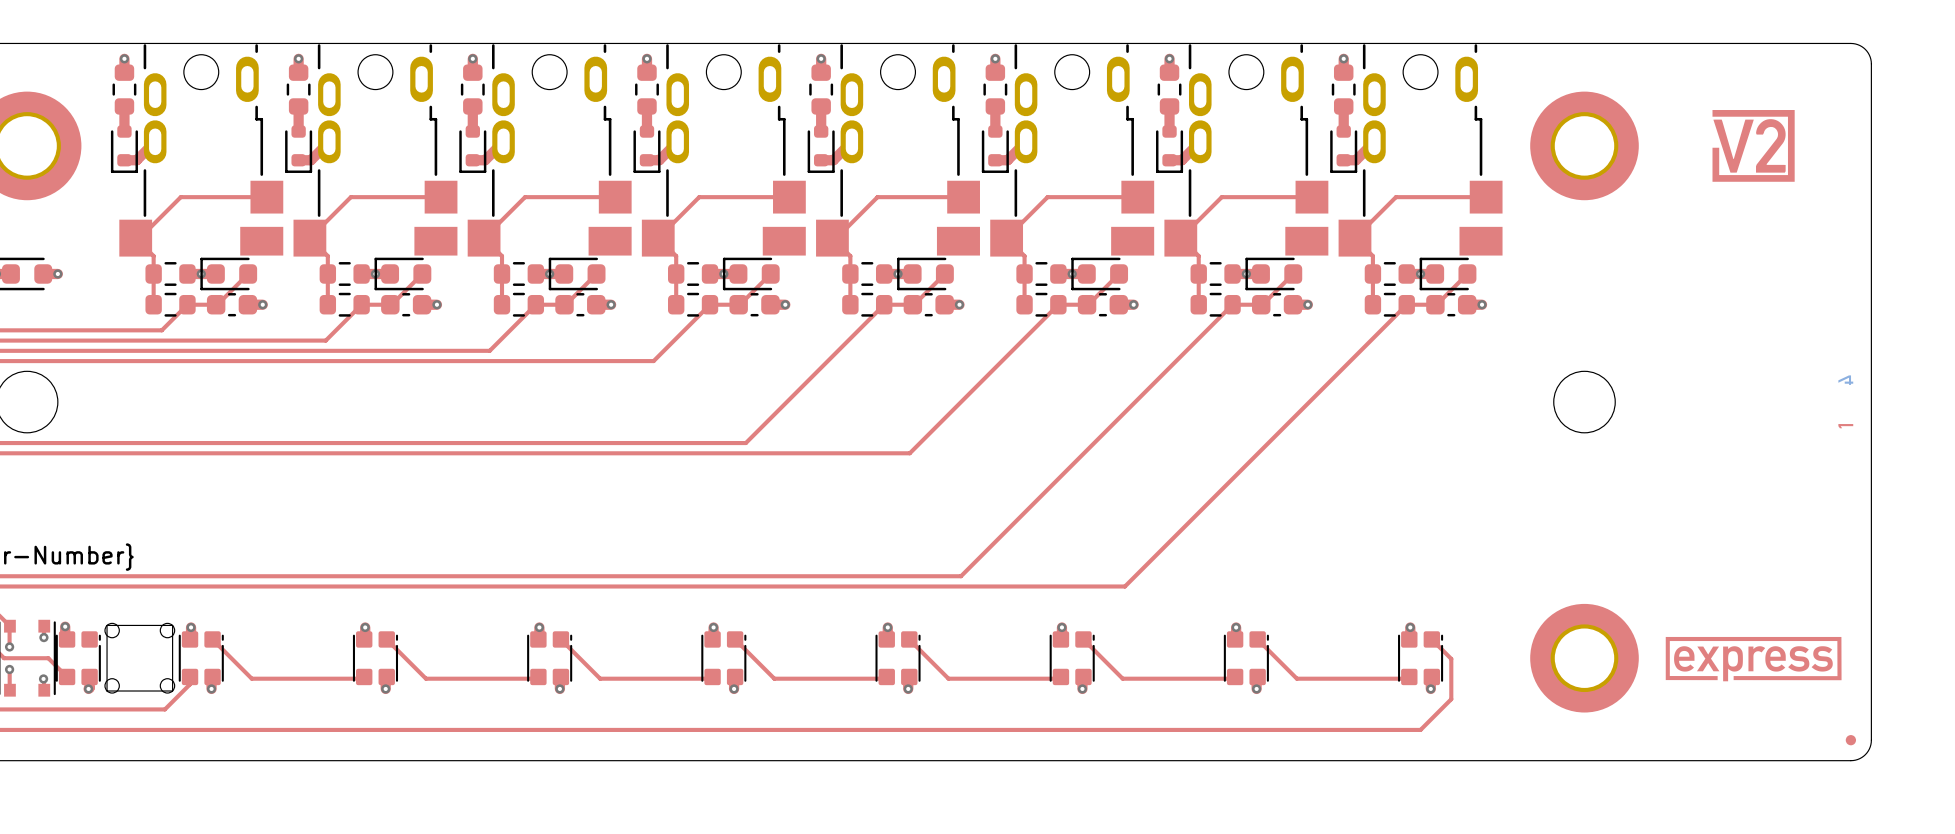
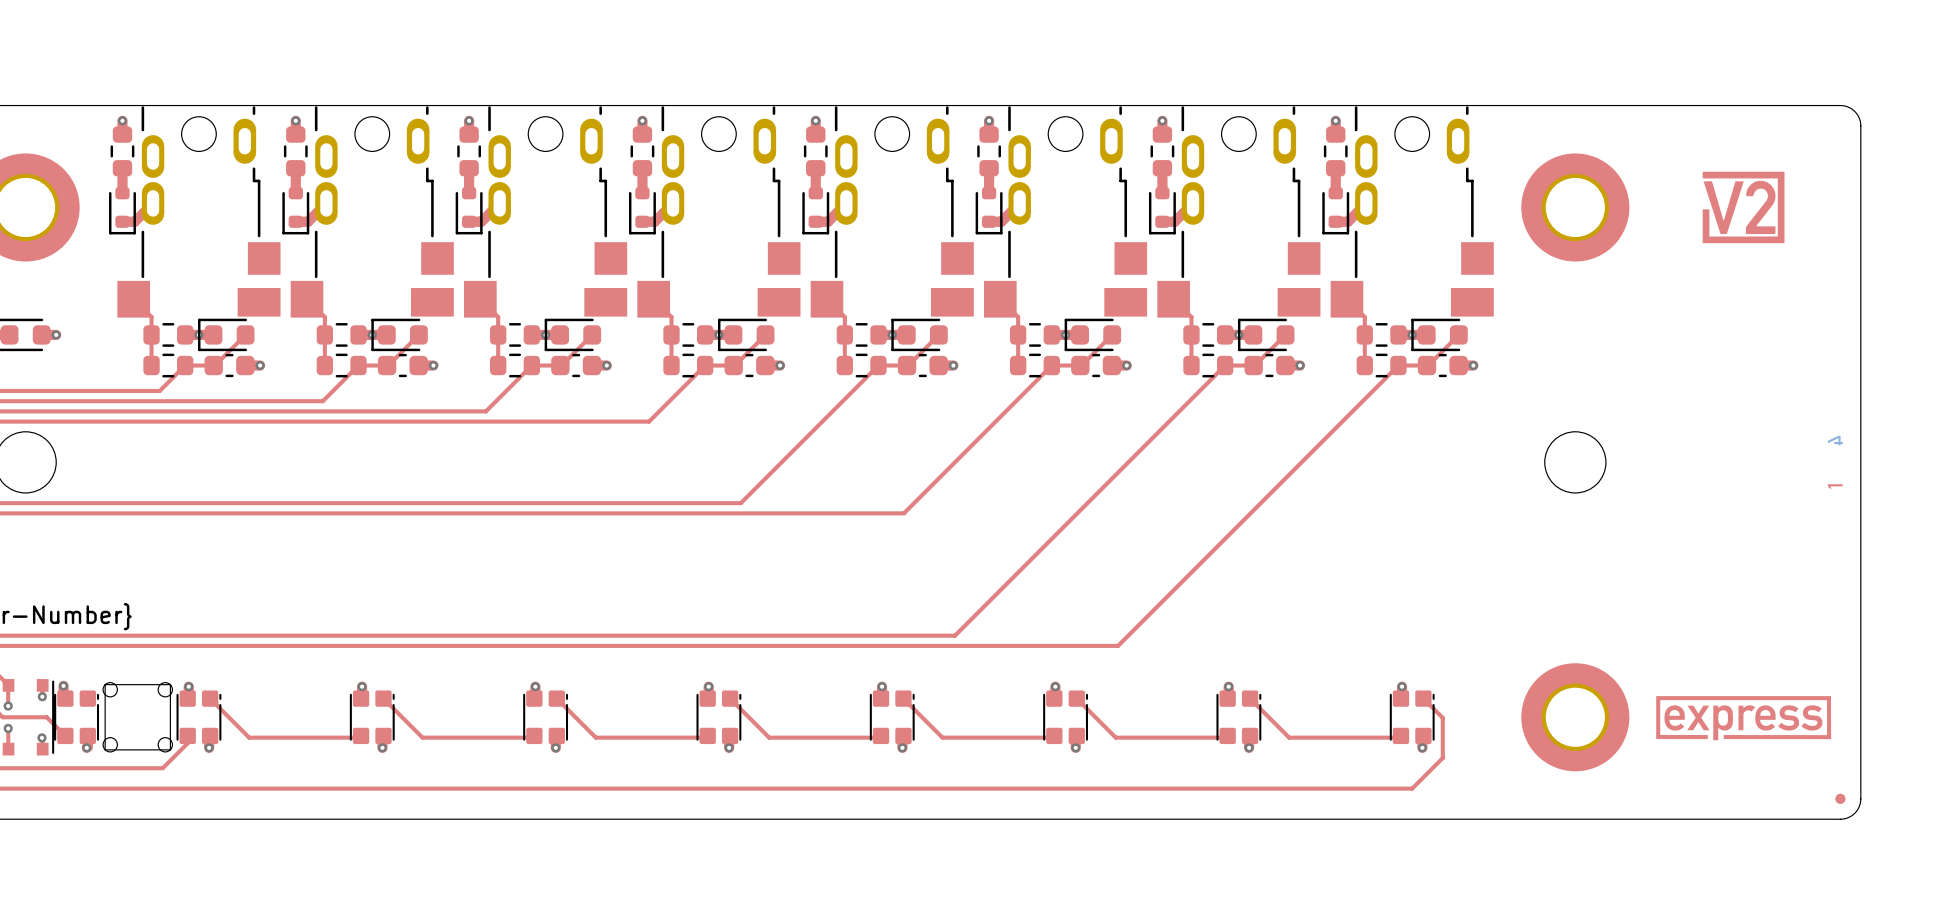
top track: (266, 197) (180, 197) (139, 238) (135, 238) -> none
top track: (441, 197) (350, 197) (309, 238) -> none
top track: (615, 197) (525, 197) (484, 238) -> none
top track: (789, 197) (699, 197) (658, 238) -> none
top track: (963, 197) (877, 197) (836, 238) (832, 238) -> none
top track: (1137, 197) (1047, 197) (1006, 238) -> none
top track: (1311, 197) (1221, 197) (1180, 238) -> none
top track: (1486, 197) (1395, 197) (1354, 238) -> none

